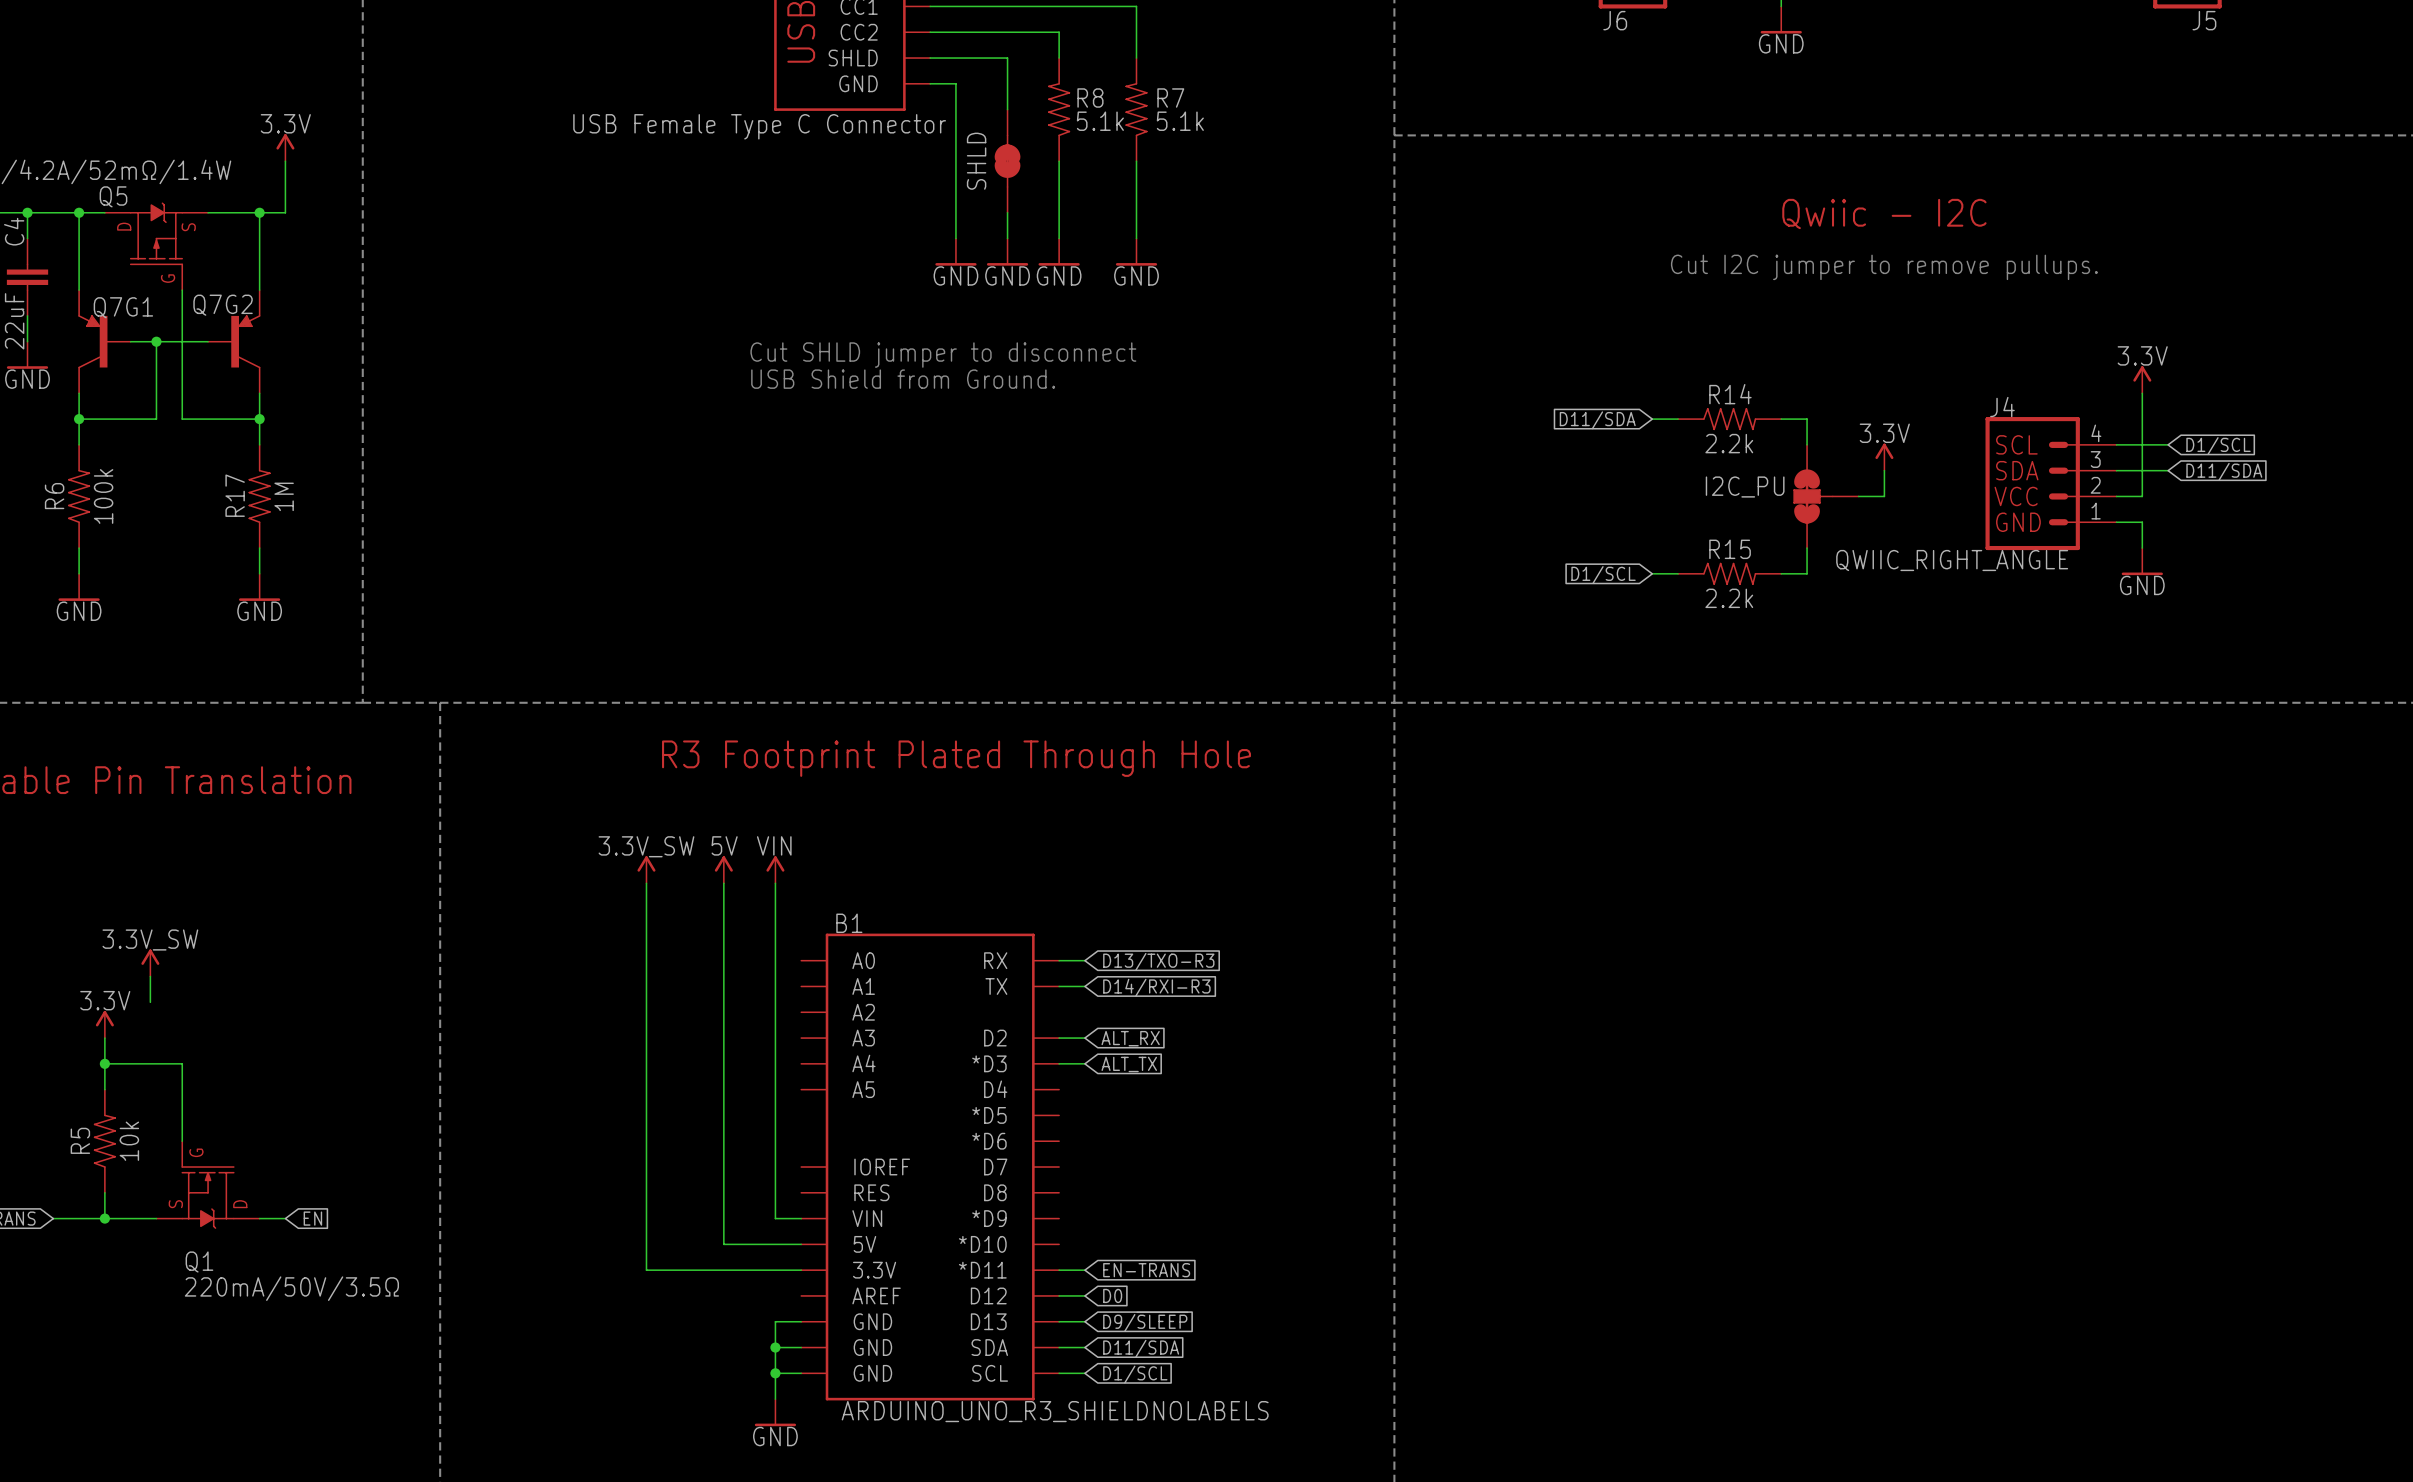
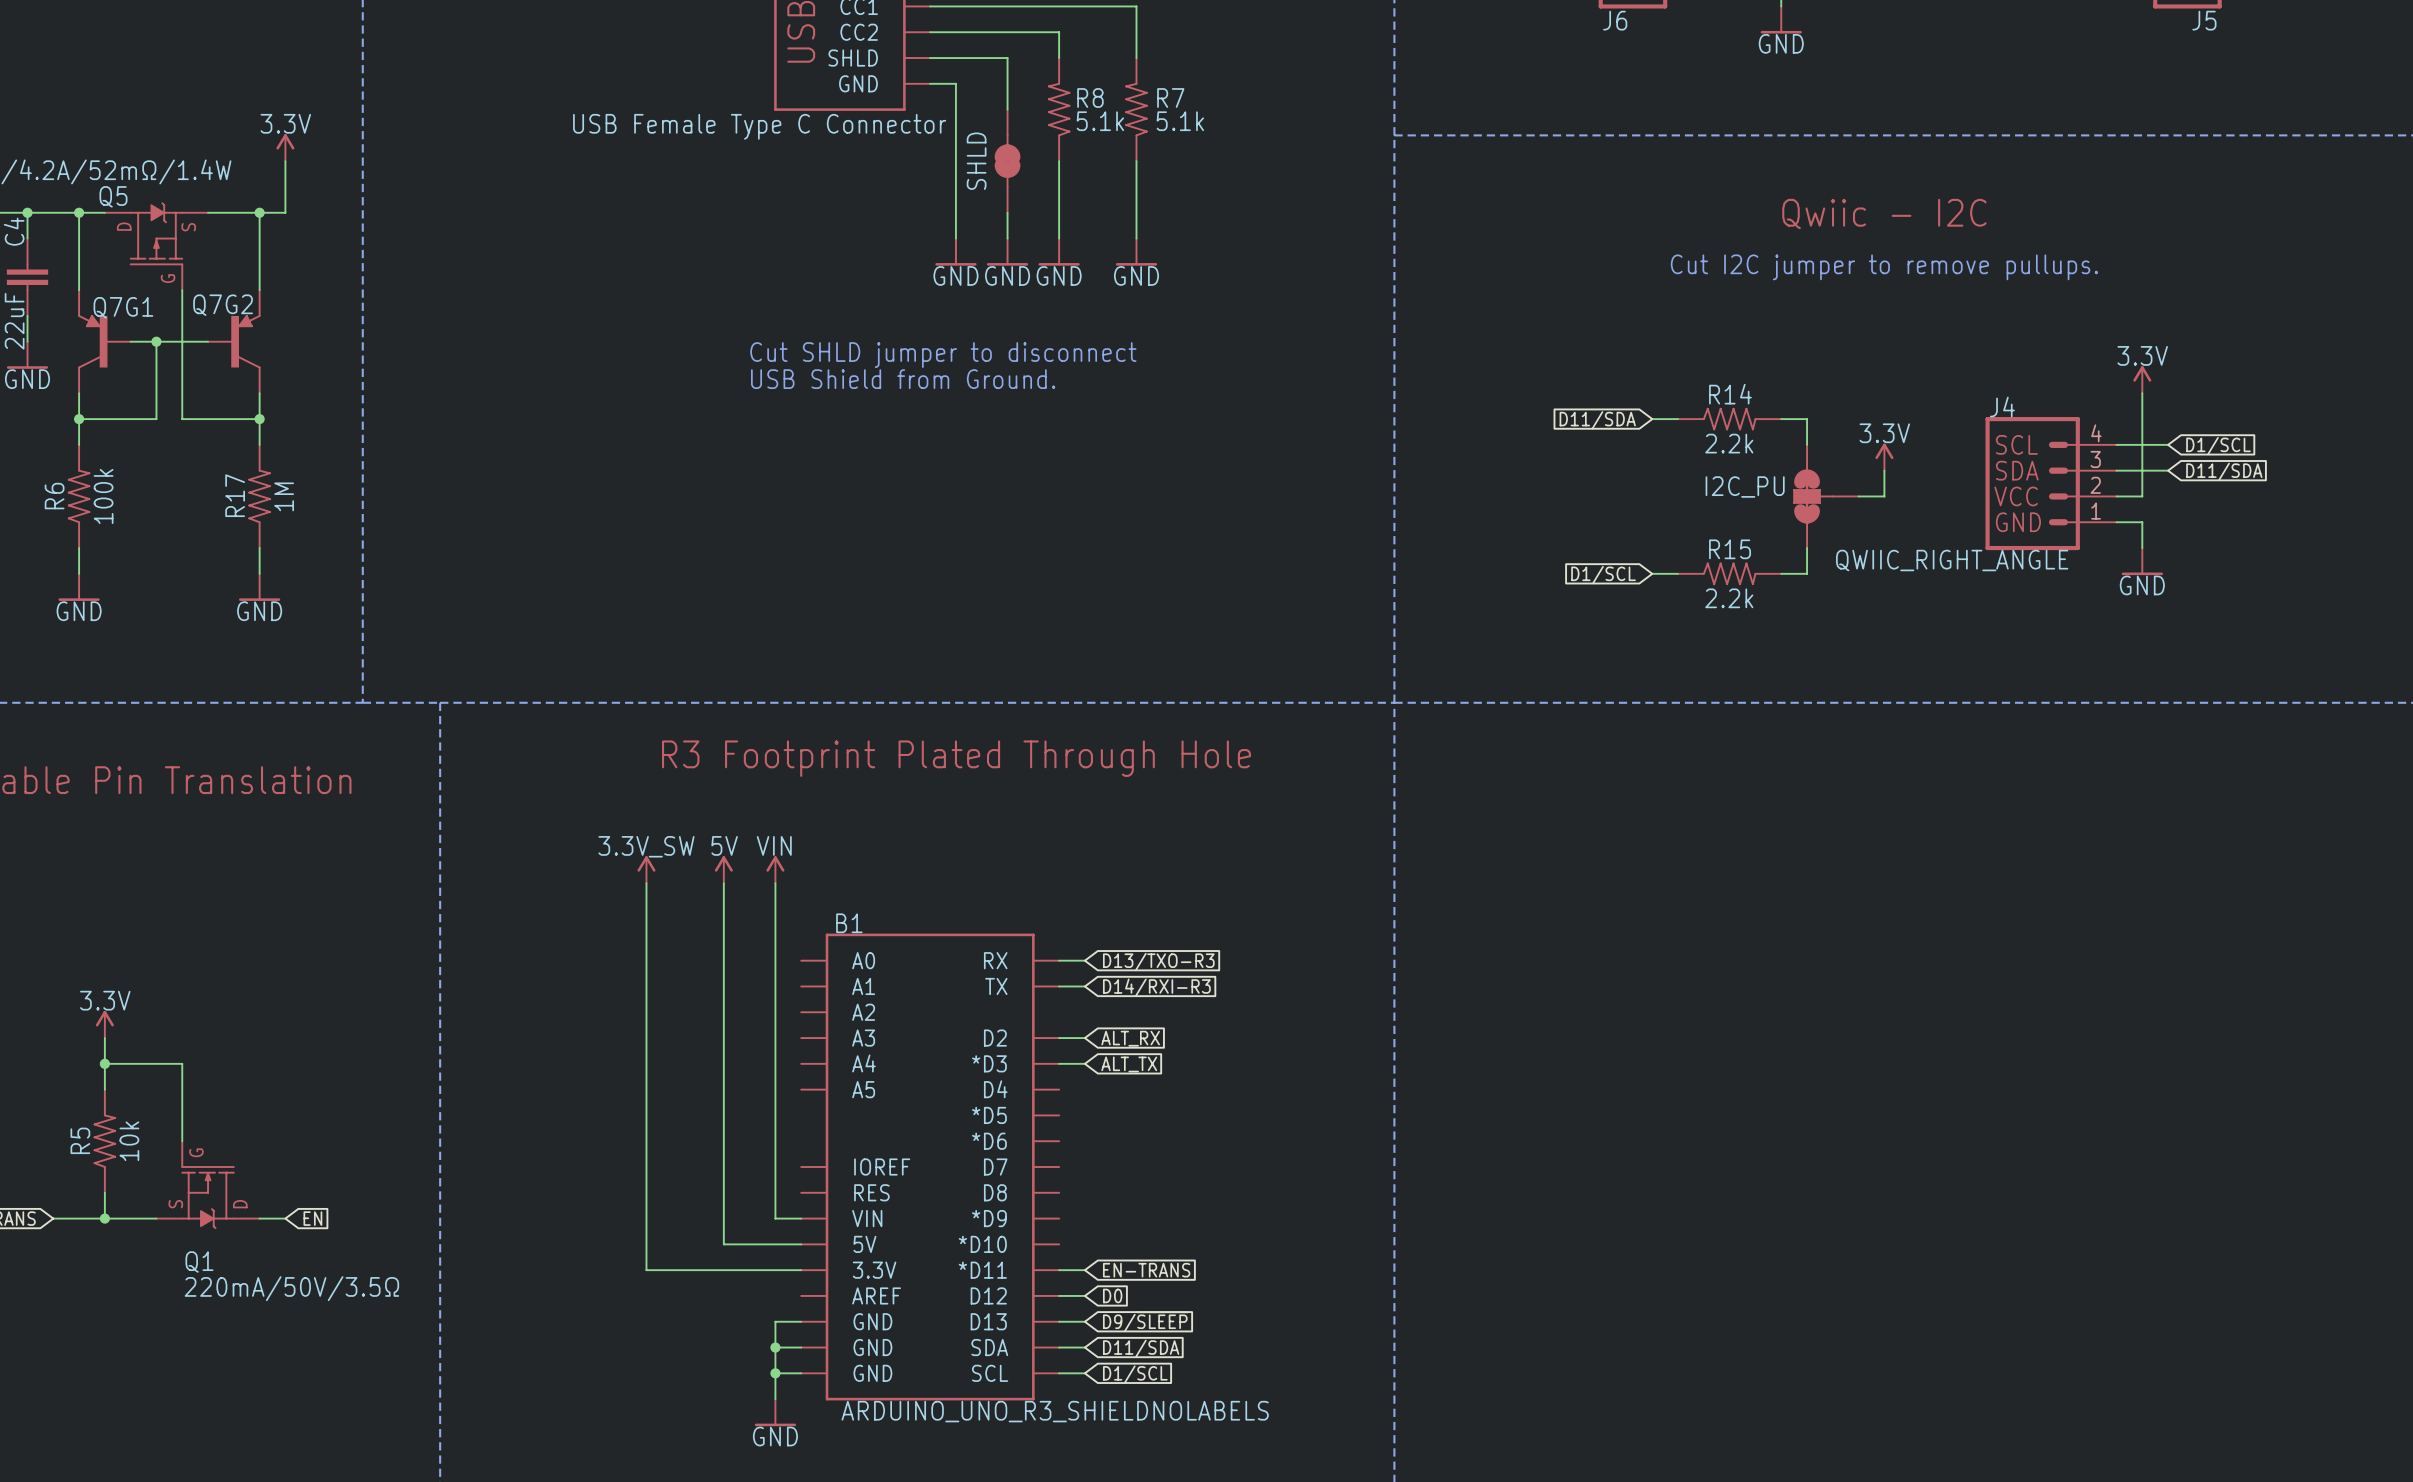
power symbol: 3.3V_SW (150, 962) -> none
wire: (150, 976) (150, 1002) -> none

